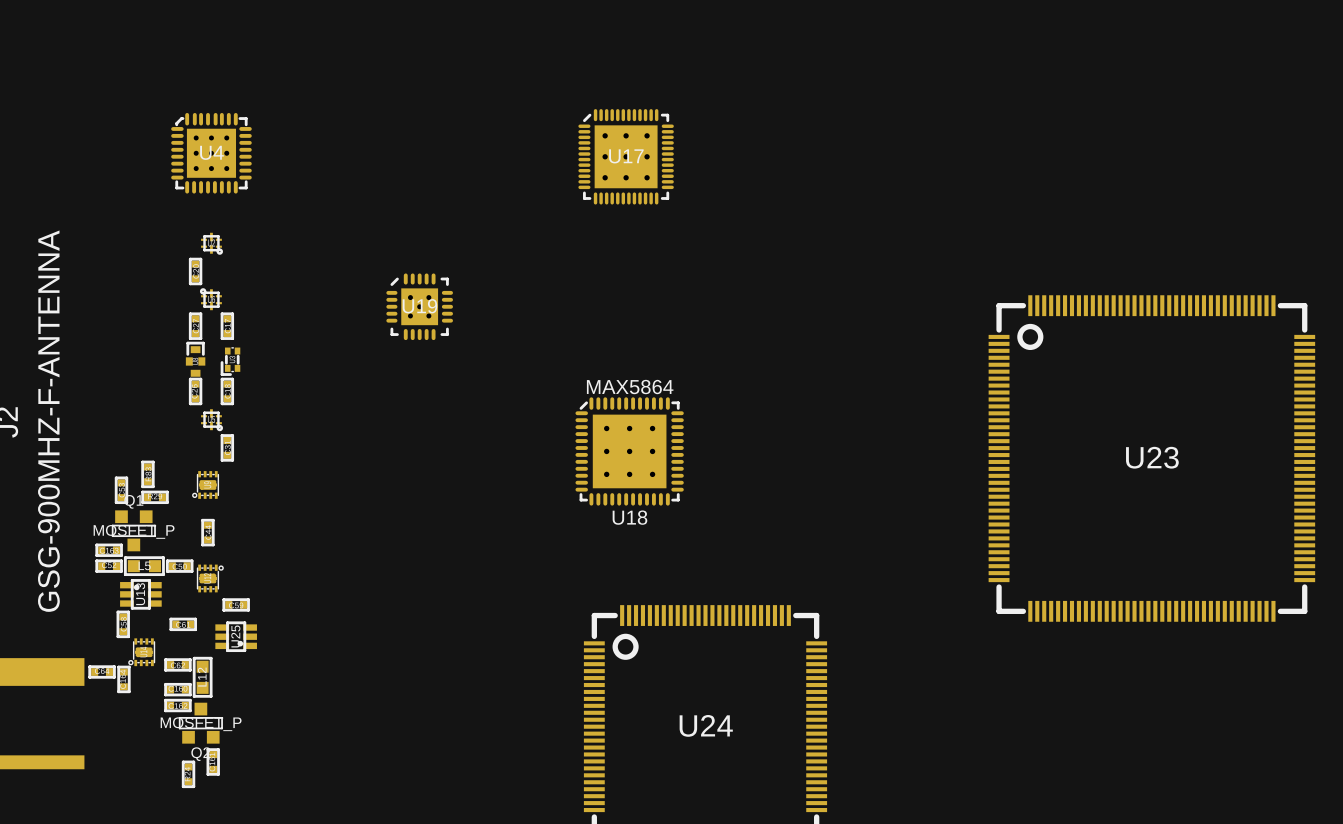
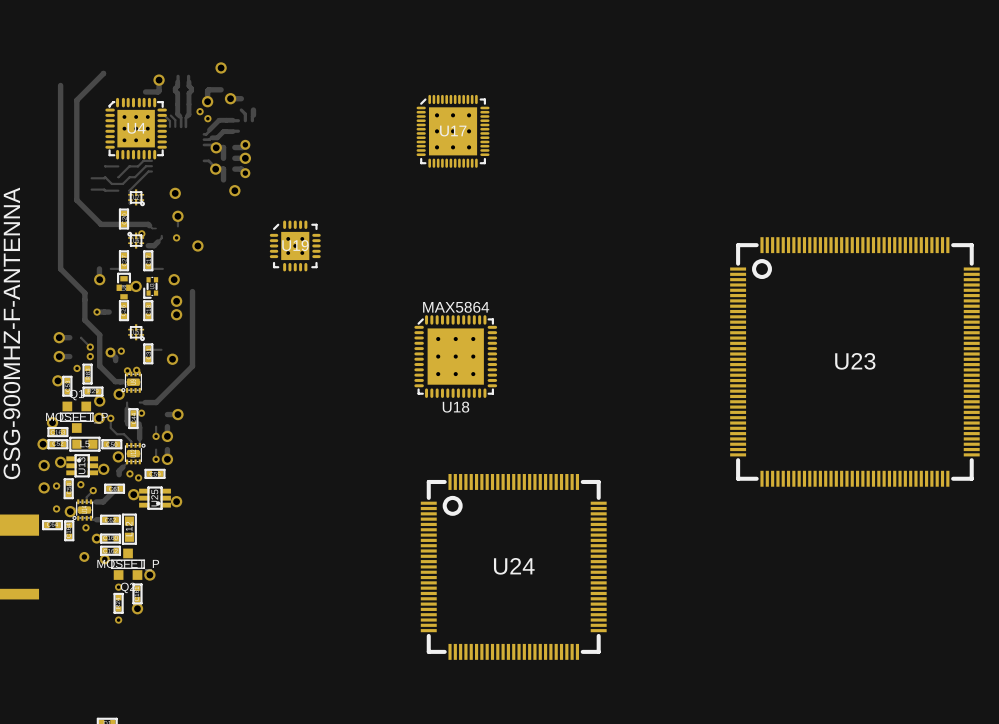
via: none -> (221, 67)
track: none -> (103, 73) (76, 100) (76, 200) (101, 224) (148, 224) (152, 228) (156, 228)
track: none -> (178, 76) (175, 90) (177, 93) (177, 114) (181, 117) (181, 126)
track: none -> (188, 76) (191, 90) (189, 93) (189, 114) (185, 117) (185, 126)
track: none -> (159, 80) (157, 91) (145, 91)
via: none -> (159, 80)
track: none -> (60, 85) (60, 268) (84, 293) (84, 320) (99, 334) (99, 365) (115, 381) (122, 381) (127, 386)
track: none -> (221, 89) (208, 89) (207, 101)
track: none -> (230, 98) (241, 98)
via: none -> (230, 98)
via: none -> (207, 101)
track: none -> (241, 110) (245, 114) (245, 120)
track: none -> (253, 110) (252, 120)
via: none -> (200, 111)
track: none -> (164, 115) (169, 120) (169, 126)
track: none -> (170, 115) (175, 120) (175, 126)
via: none -> (207, 118)
track: none -> (238, 120) (219, 120) (206, 134) (203, 134)
track: none -> (238, 131) (223, 131) (217, 137) (203, 139)
track: none -> (203, 144) (223, 147) (223, 158)
track: none -> (245, 144) (242, 147) (234, 147)
via: none -> (245, 144)
via: none -> (216, 147)
track: none -> (234, 158) (245, 158)
via: none -> (245, 158)
track: none -> (151, 160) (143, 160) (138, 166) (129, 166) (118, 177)
track: none -> (203, 160) (208, 160) (215, 169) (223, 169) (223, 179)
track: none -> (105, 166) (118, 166)
track: none -> (151, 166) (146, 166) (135, 177) (129, 177) (122, 183) (111, 183) (105, 177) (91, 178)
via: none -> (215, 169)
track: none -> (234, 169) (241, 169) (245, 173)
track: none -> (151, 171) (148, 171) (129, 190) (130, 204)
via: none -> (245, 173)
track: none -> (91, 189) (118, 190)
via: none -> (234, 190)
via: none -> (175, 193)
track: none -> (177, 216) (177, 226)
via: none -> (177, 216)
via: none -> (141, 233)
track: none -> (161, 235) (154, 245) (148, 245)
via: none -> (176, 237)
via: none -> (197, 245)
track: none -> (99, 268) (99, 279)
track: none -> (110, 268) (119, 268)
track: none -> (153, 268) (162, 268)
via: none -> (99, 279)
via: none -> (174, 279)
via: none -> (136, 286)
track: none -> (192, 291) (192, 366) (156, 402) (139, 402)
via: none -> (176, 301)
track: none -> (97, 312) (109, 312)
via: none -> (97, 312)
via: none -> (176, 314)
track: none -> (59, 337) (69, 337)
via: none -> (59, 337)
track: none -> (81, 337) (90, 347)
via: none -> (90, 347)
track: none -> (152, 349) (161, 349)
via: none -> (121, 351)
track: none -> (110, 352) (115, 357) (115, 360)
via: none -> (110, 352)
track: none -> (59, 356) (69, 356)
via: none -> (59, 356)
via: none -> (90, 356)
via: none -> (172, 359)
via: none -> (77, 368)
via: none -> (136, 370)
via: none -> (127, 370)
via: none -> (57, 380)
via: none -> (119, 394)
via: none -> (99, 401)
track: none -> (127, 402) (127, 423)
via: none -> (141, 413)
track: none -> (167, 414) (177, 414)
via: none -> (177, 414)
via: none -> (99, 418)
track: none -> (110, 418) (110, 428) (116, 434) (123, 434) (131, 441) (131, 445)
via: none -> (110, 418)
via: none -> (52, 422)
track: none -> (139, 423) (139, 445)
track: none -> (156, 426) (156, 436)
track: none -> (167, 426) (167, 436)
via: none -> (156, 436)
via: none -> (167, 436)
via: none -> (43, 444)
track: none -> (156, 449) (156, 459)
track: none -> (167, 449) (167, 459)
via: none -> (118, 456)
via: none -> (156, 459)
via: none -> (167, 459)
via: none -> (60, 462)
track: none -> (127, 461) (119, 470) (119, 474)
via: none -> (44, 465)
via: none -> (103, 469)
via: none -> (129, 473)
via: none -> (138, 477)
via: none -> (80, 484)
via: none -> (56, 486)
track: none -> (119, 486) (103, 501) (96, 501)
via: none -> (44, 487)
track: none -> (93, 490) (86, 497) (86, 501)
via: none -> (93, 490)
via: none -> (133, 494)
via: none -> (176, 501)
via: none -> (56, 508)
via: none -> (70, 511)
track: none -> (90, 518) (104, 519)
via: none -> (85, 527)
via: none -> (96, 538)
via: none -> (84, 556)
via: none -> (104, 559)
via: none -> (149, 575)
via: none -> (118, 587)
via: none -> (137, 608)
via: none -> (118, 620)

